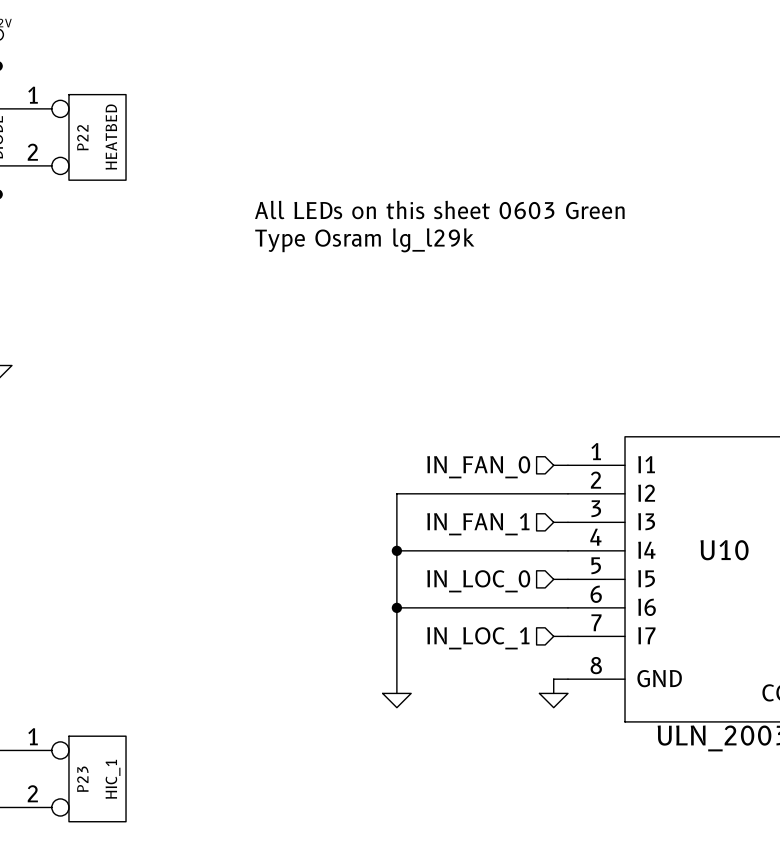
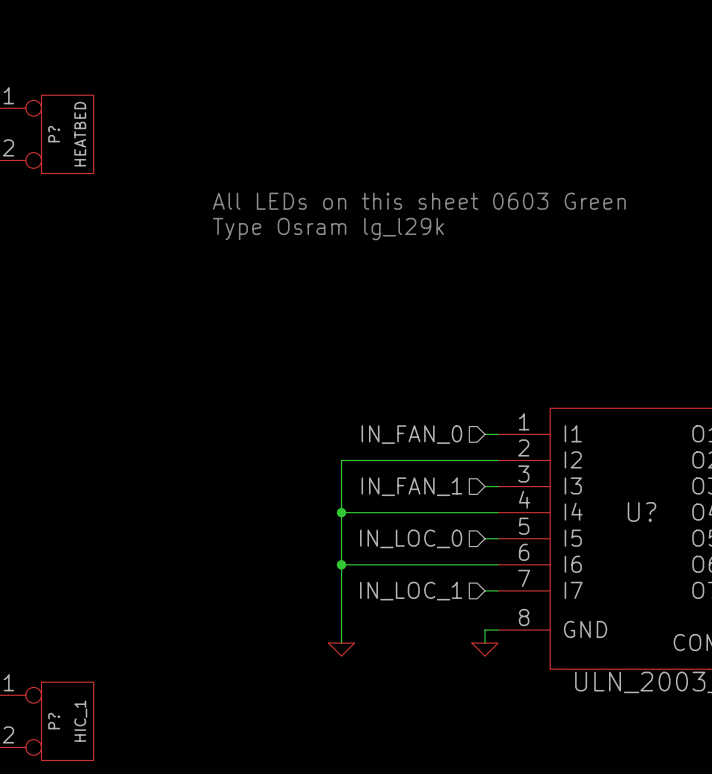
P22 name: P22 (82, 137) -> P? (54, 134)
U10 name: U10 (724, 550) -> U? (641, 511)
P23 name: P23 (82, 779) -> P? (54, 721)

